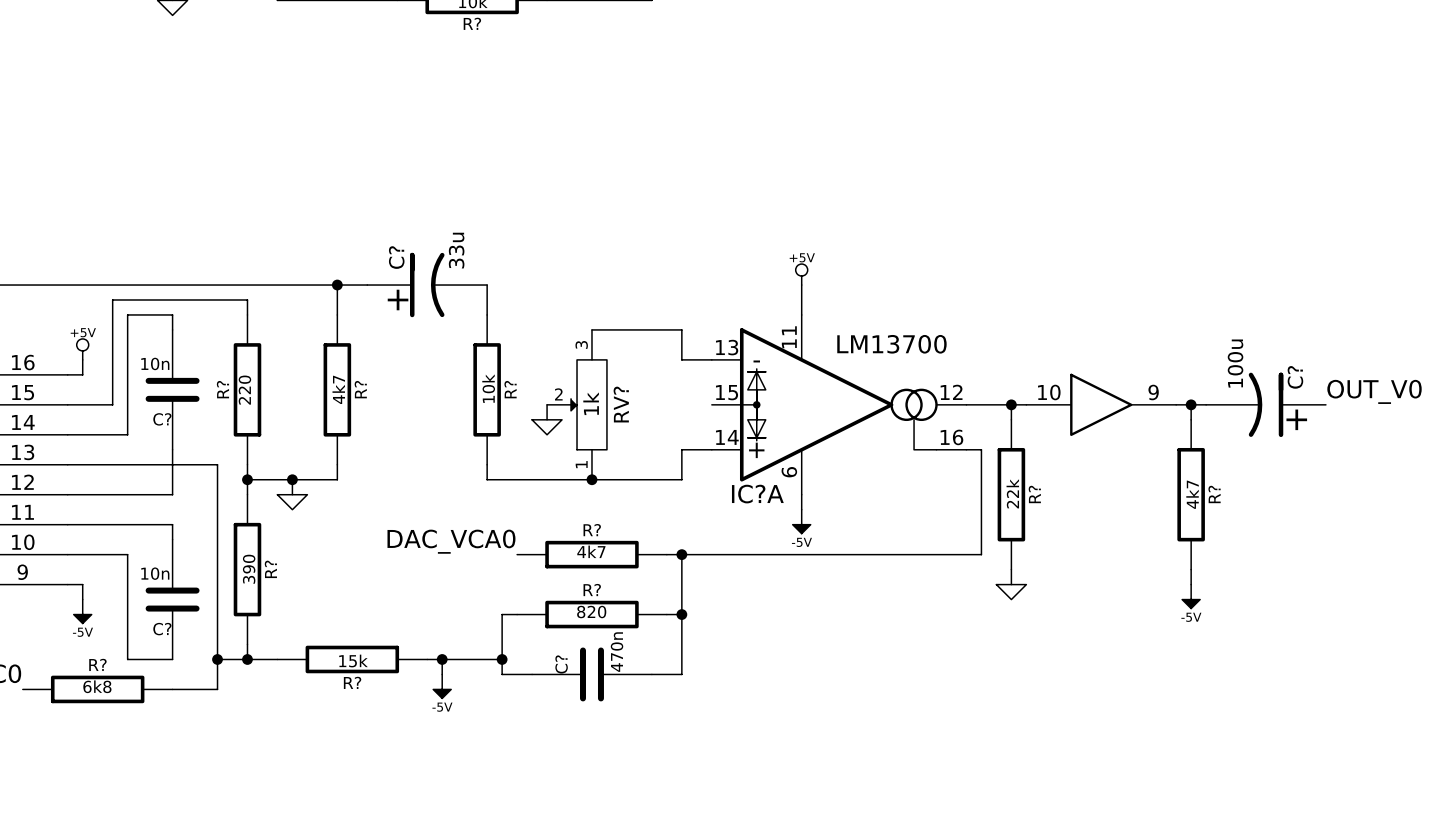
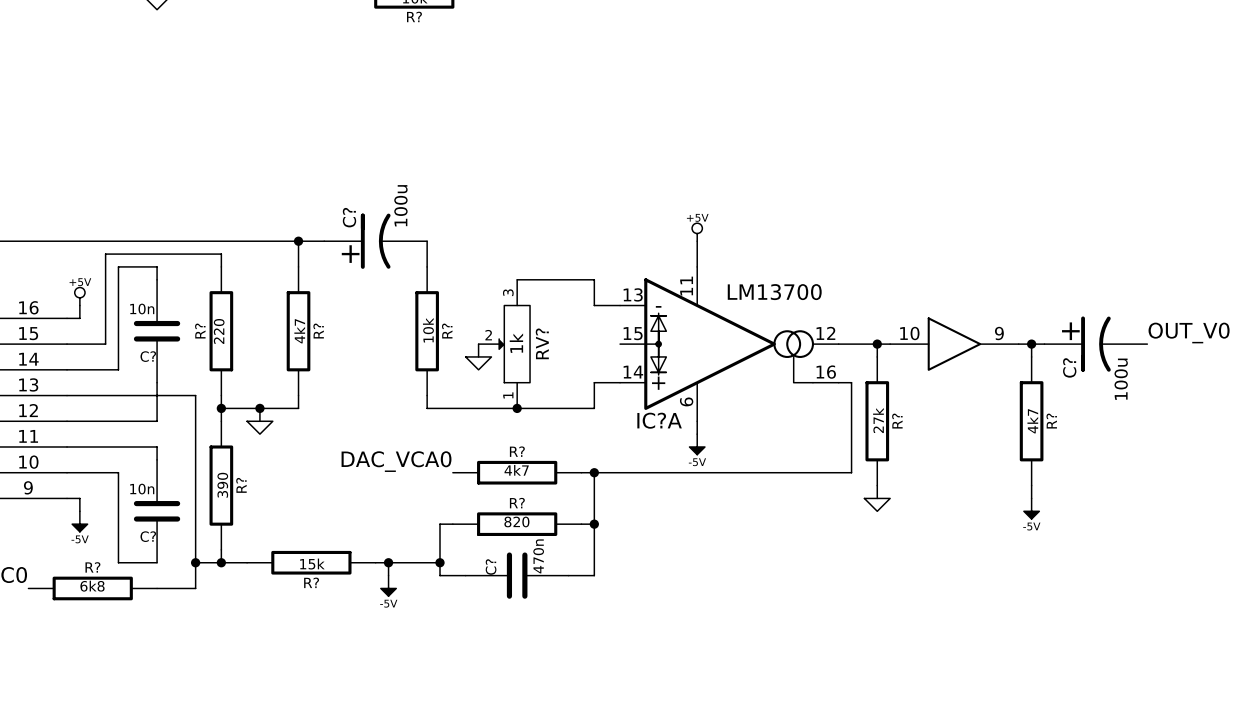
C? value: 33u (456, 250) -> 100u (400, 205)
C? rotation: 0° (1265, 404) -> 180° (1095, 344)
R? value: 22k (1012, 493) -> 27k (878, 420)

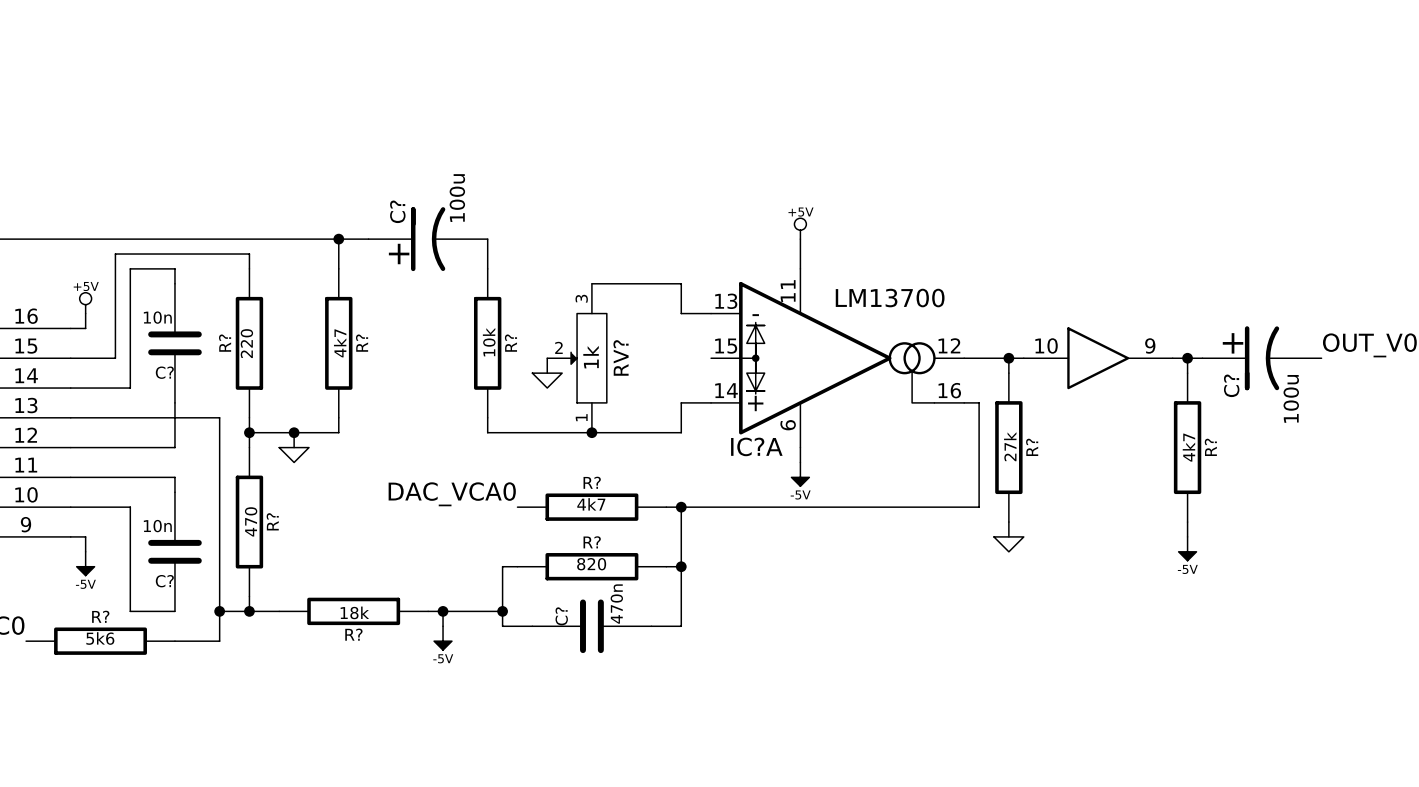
R? value: 390 (222, 485) -> 470 (251, 521)
R? value: 15k (312, 564) -> 18k (354, 612)
R? value: 6k8 (92, 586) -> 5k6 (100, 638)

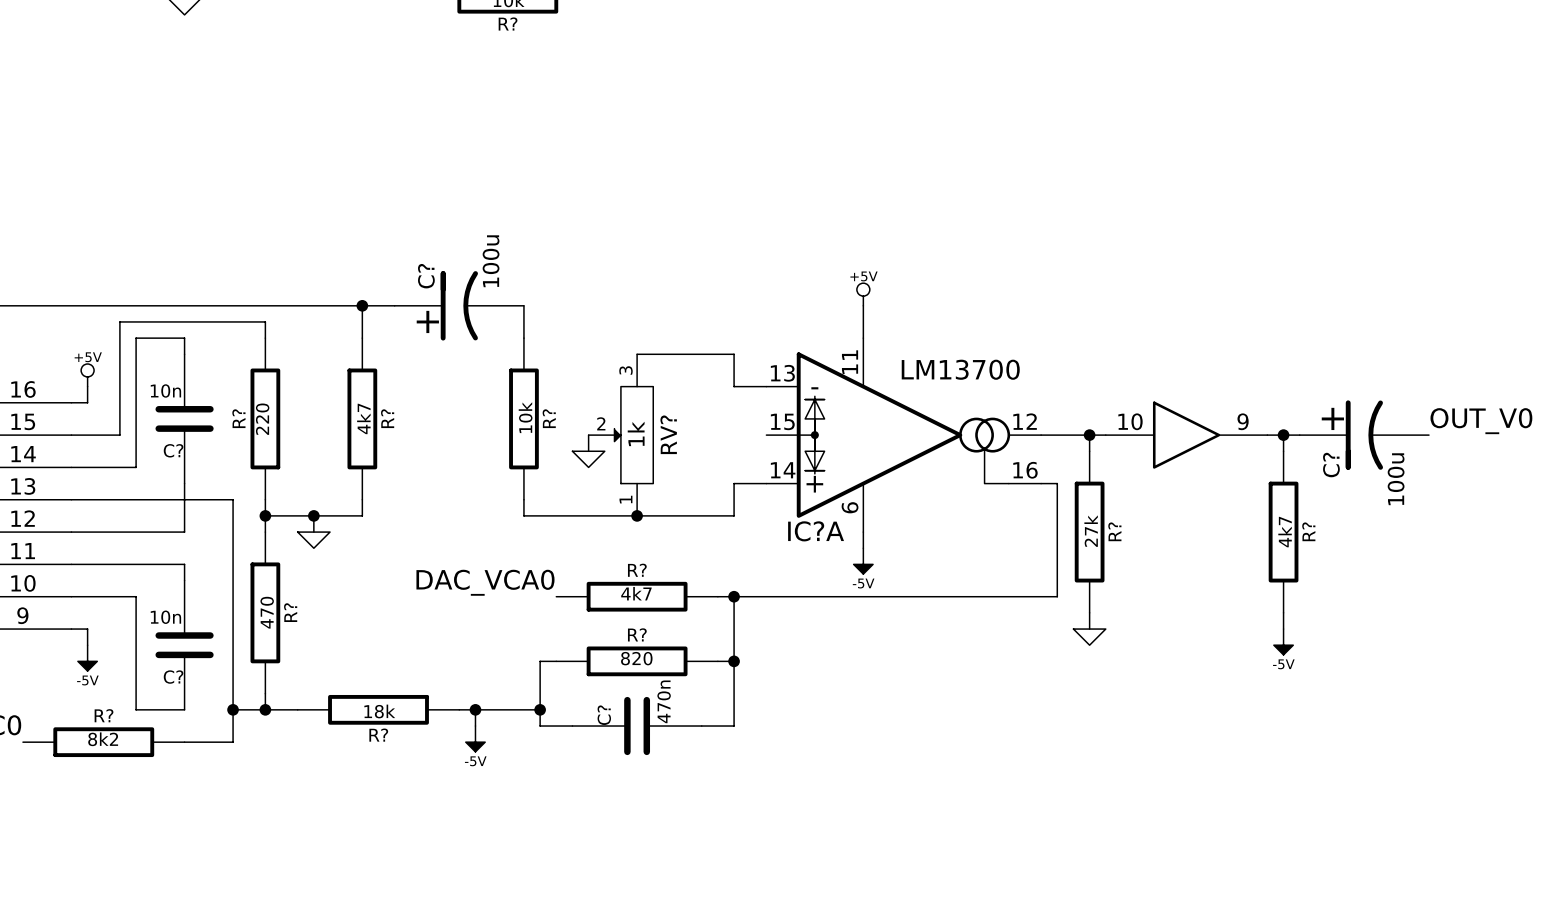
R? value: 5k6 (100, 638) -> 8k2 (103, 739)

